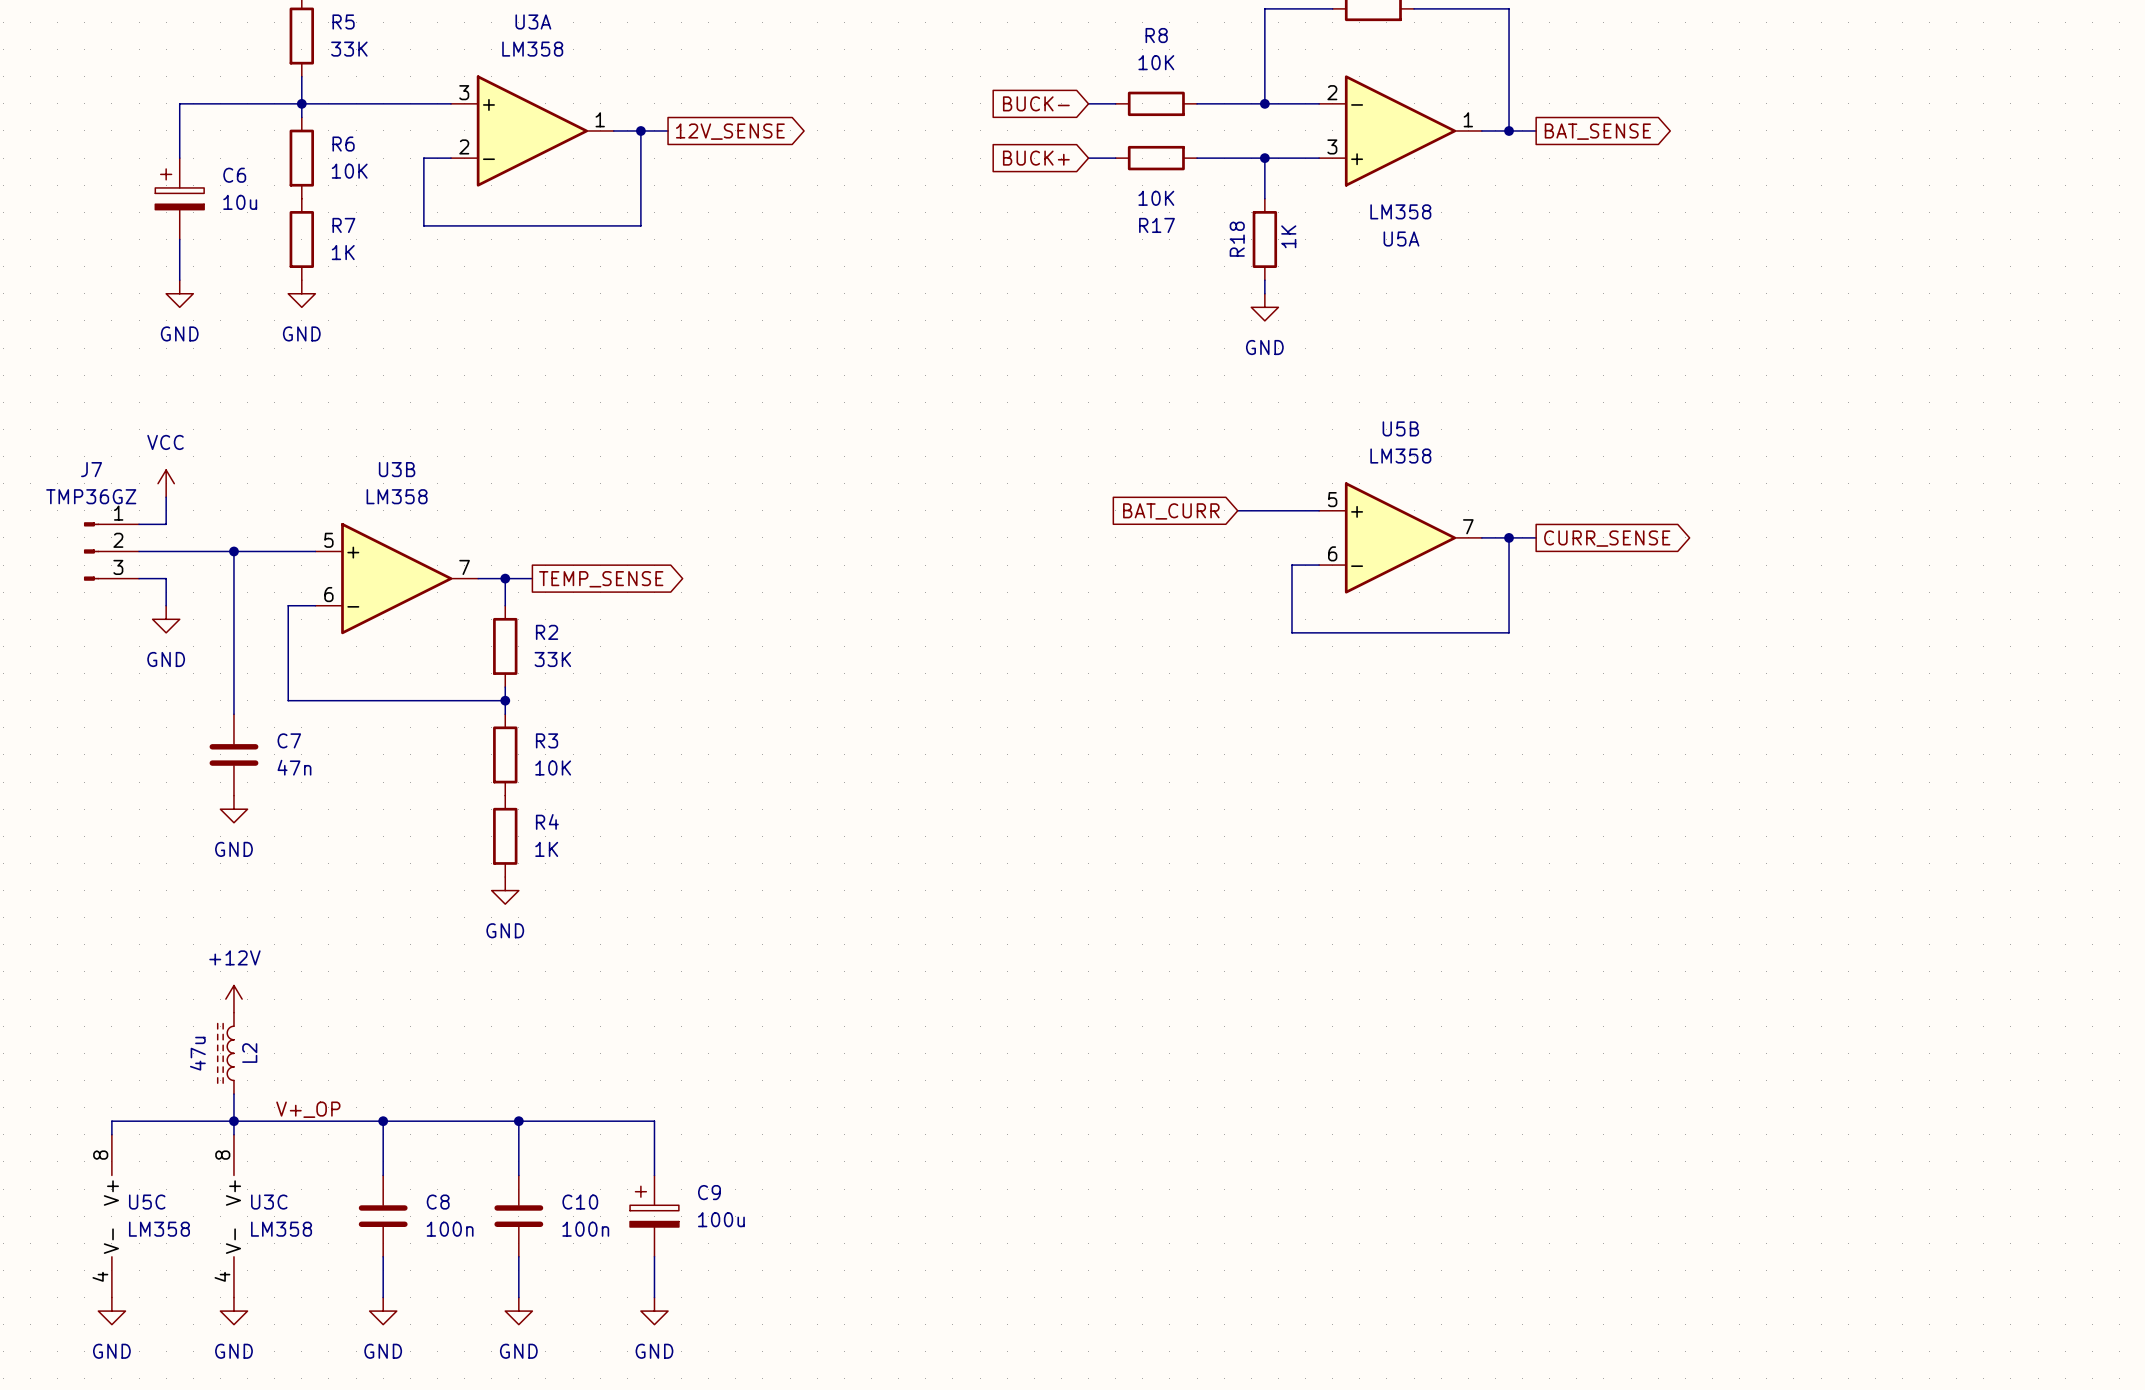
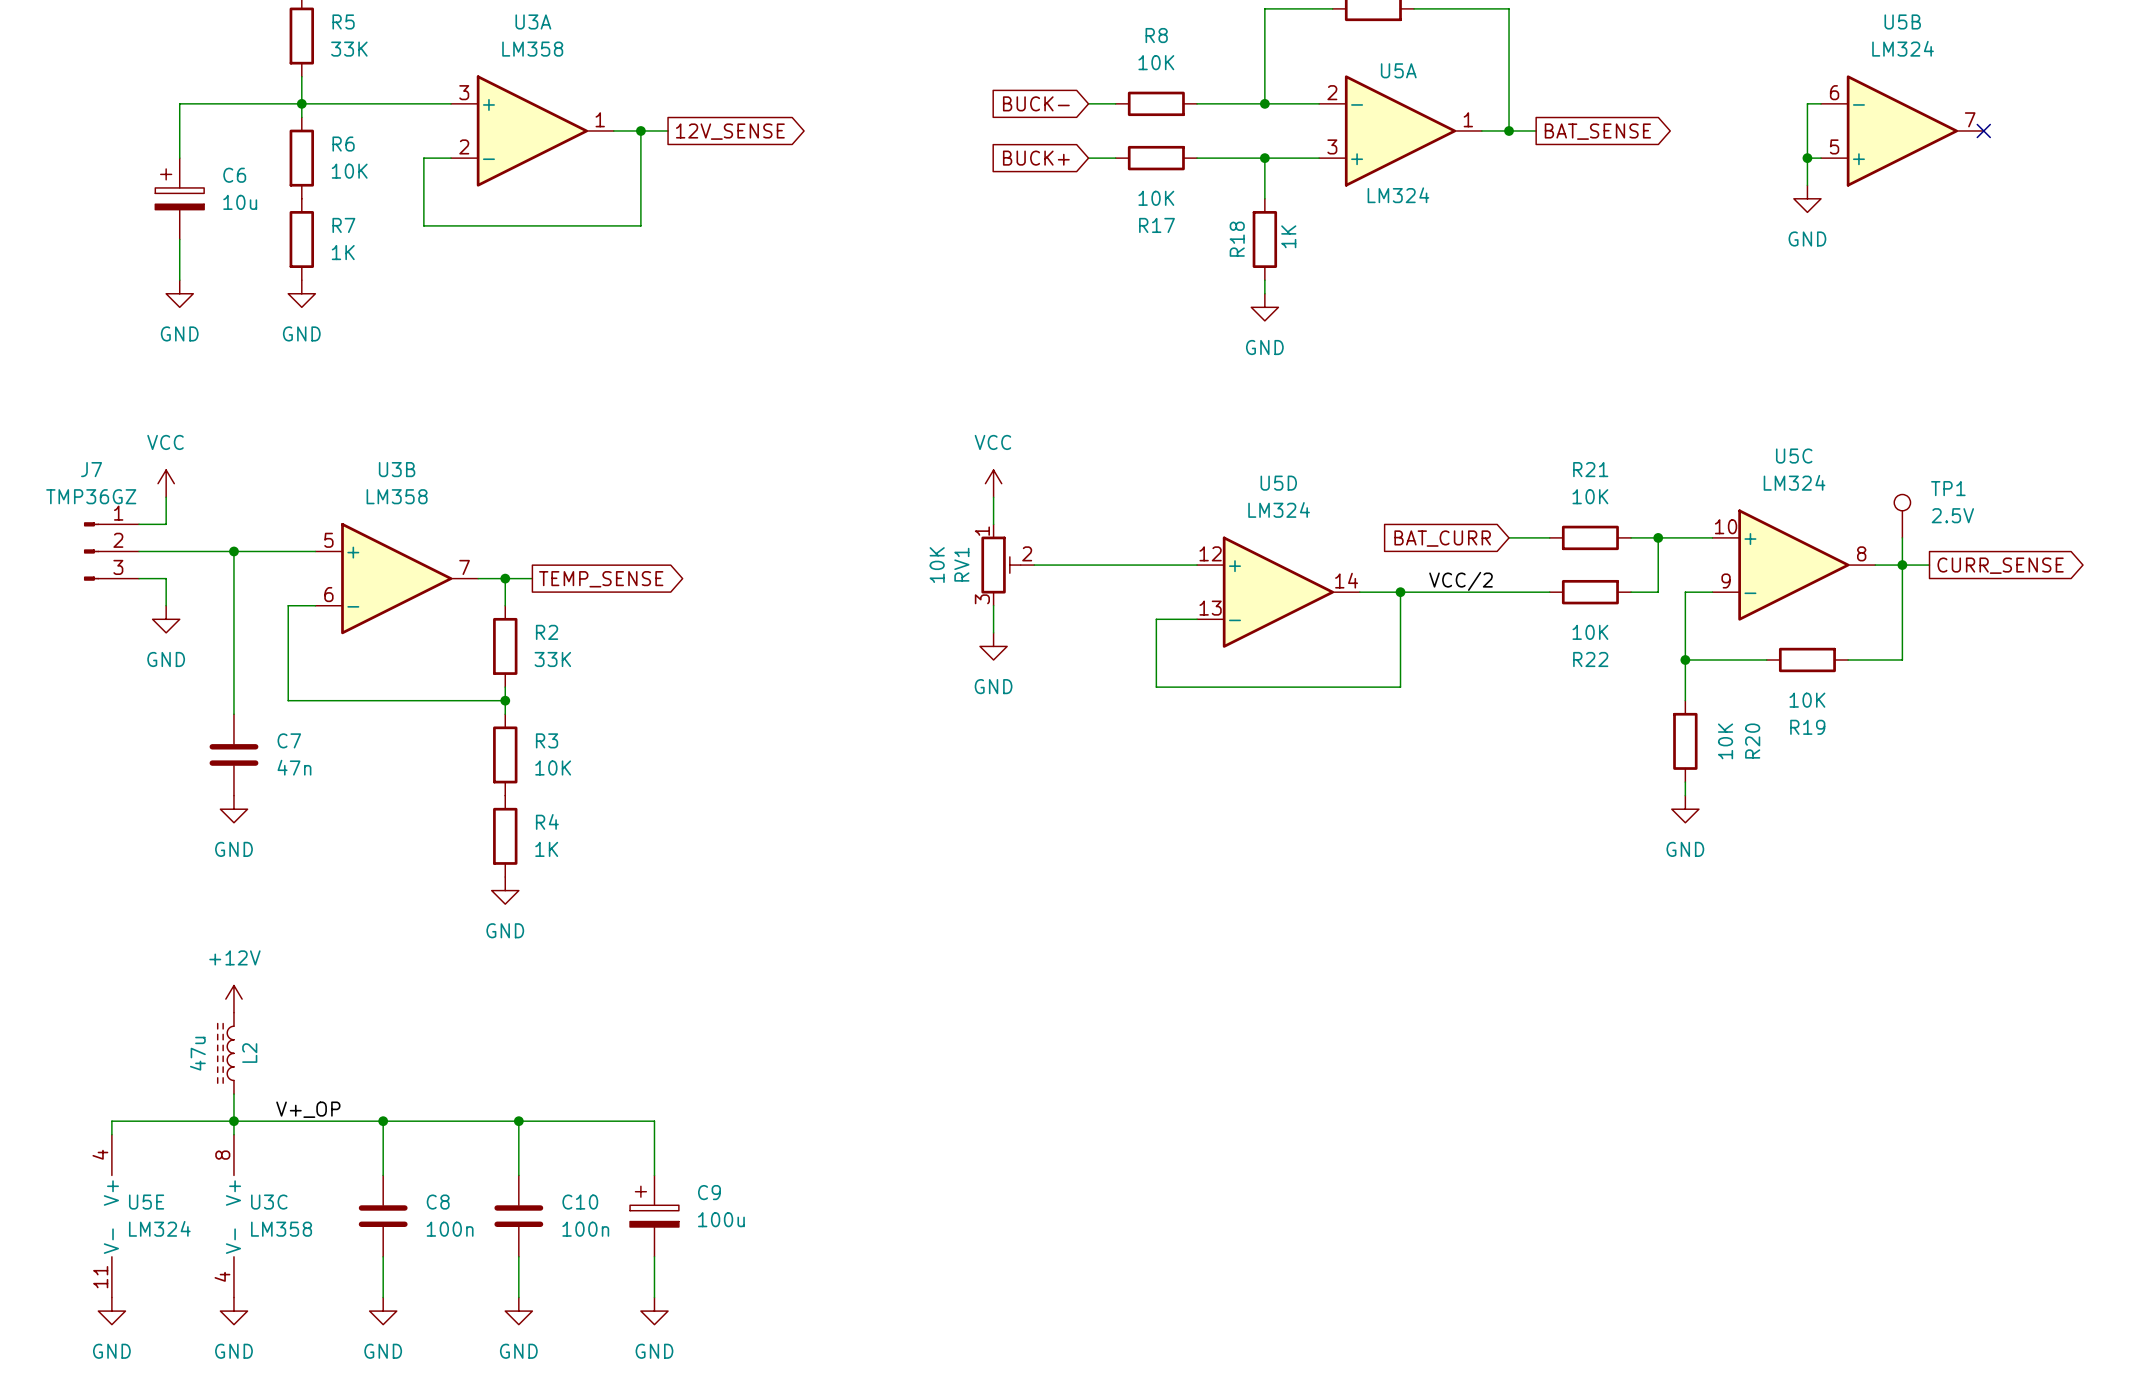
wire: none -> (1821, 103) (1807, 103) (1807, 185)
no-connect mark: none -> (1983, 130)
wire: none -> (1807, 158) (1821, 158)
junction: none -> (1807, 158)
power symbol: none -> GND (1807, 198)
U5A value: LM358 (1400, 211) -> LM324 (1398, 195)
U5A name position: U5A (1401, 238) -> U5A (1398, 70)
U5B value: LM358 (1400, 456) -> LM324 (1903, 48)
power symbol: none -> VCC (993, 483)
wire: none -> (993, 497) (993, 524)
wire: (1237, 510) (1319, 510) -> none
global label: BAT_CURR (1171, 511) -> none
TP1: none -> 2.5V (1902, 516)
U5B flip: as is (1400, 537) -> up-down (1902, 130)
U5B position: (1400, 537) -> (1902, 130)
wire: (1481, 537) (1509, 537) (1509, 632) (1291, 632) (1291, 565) (1319, 565) -> none
junction: (1509, 537) -> none
wire: none -> (1536, 537) (1549, 537)
R21: none -> 10K (1590, 537)
wire: none -> (1631, 537) (1712, 537)
wire: none -> (1658, 537) (1658, 592) (1631, 592)
junction: none -> (1658, 537)
wire: none -> (1902, 537) (1902, 659) (1848, 659)
global label: none -> BAT_CURR (1442, 538)
global label: CURR_SENSE (1607, 538) -> none
RV1: none -> 10K (1007, 565)
wire: none -> (1034, 565) (1197, 565)
wire: none -> (1875, 565) (1929, 565)
junction: none -> (1902, 565)
global label: none -> CURR_SENSE (2000, 565)
label: none -> VCC/2 (1461, 581)
U5D: none -> LM324 (1278, 592)
wire: none -> (1359, 592) (1549, 592)
wire: none -> (1400, 592) (1400, 687) (1156, 687) (1156, 619) (1197, 619)
junction: none -> (1400, 592)
R22: none -> 10K (1590, 592)
wire: none -> (1712, 592) (1685, 592) (1685, 700)
wire: none -> (993, 605) (993, 632)
power symbol: none -> GND (993, 646)
wire: none -> (1685, 659) (1766, 659)
junction: none -> (1685, 659)
R19: none -> 10K (1807, 659)
R20: none -> 10K (1685, 741)
wire: none -> (1685, 782) (1685, 795)
power symbol: none -> GND (1685, 809)
U5C symbol: [111, 1134, 112, 1298] -> [1712, 509, 1876, 621]
U5C name position: U5C (147, 1202) -> U5C (1794, 456)
U5E: none -> LM324 (111, 1216)
U5C value: LM358 (159, 1229) -> LM324 (1794, 482)

